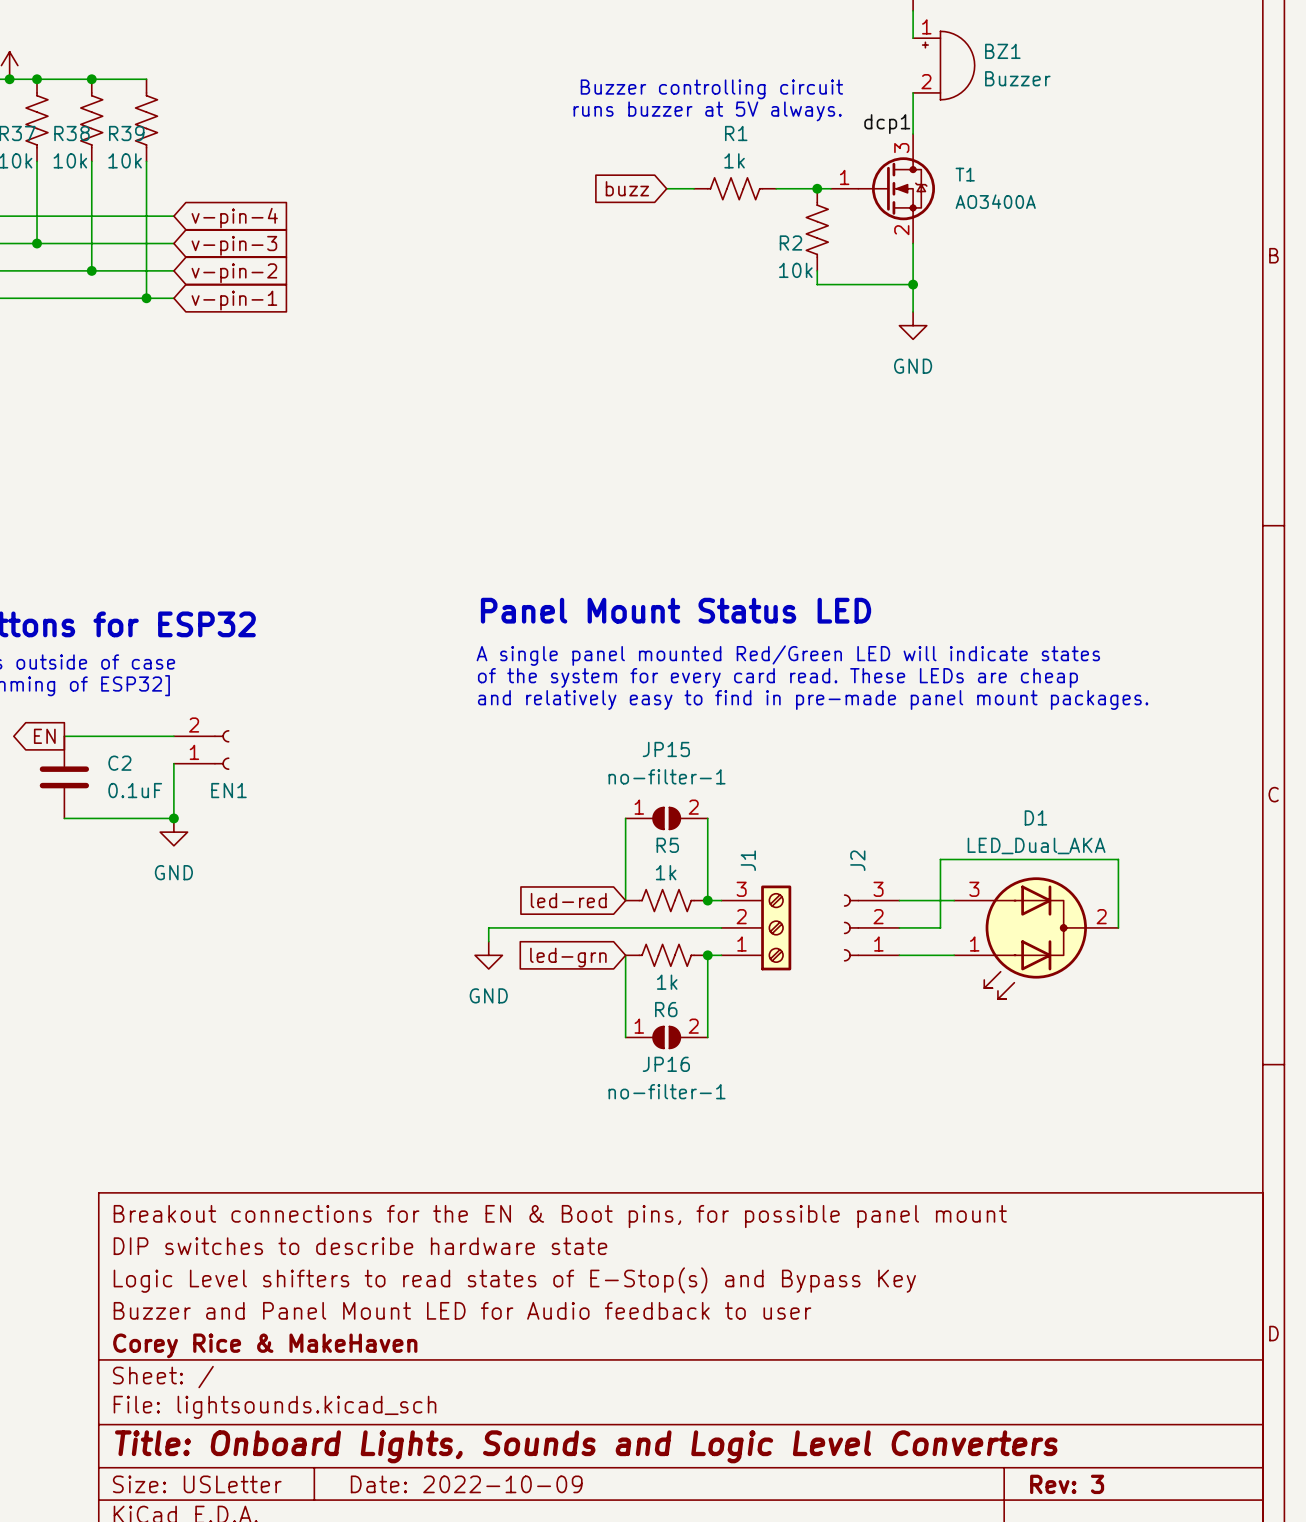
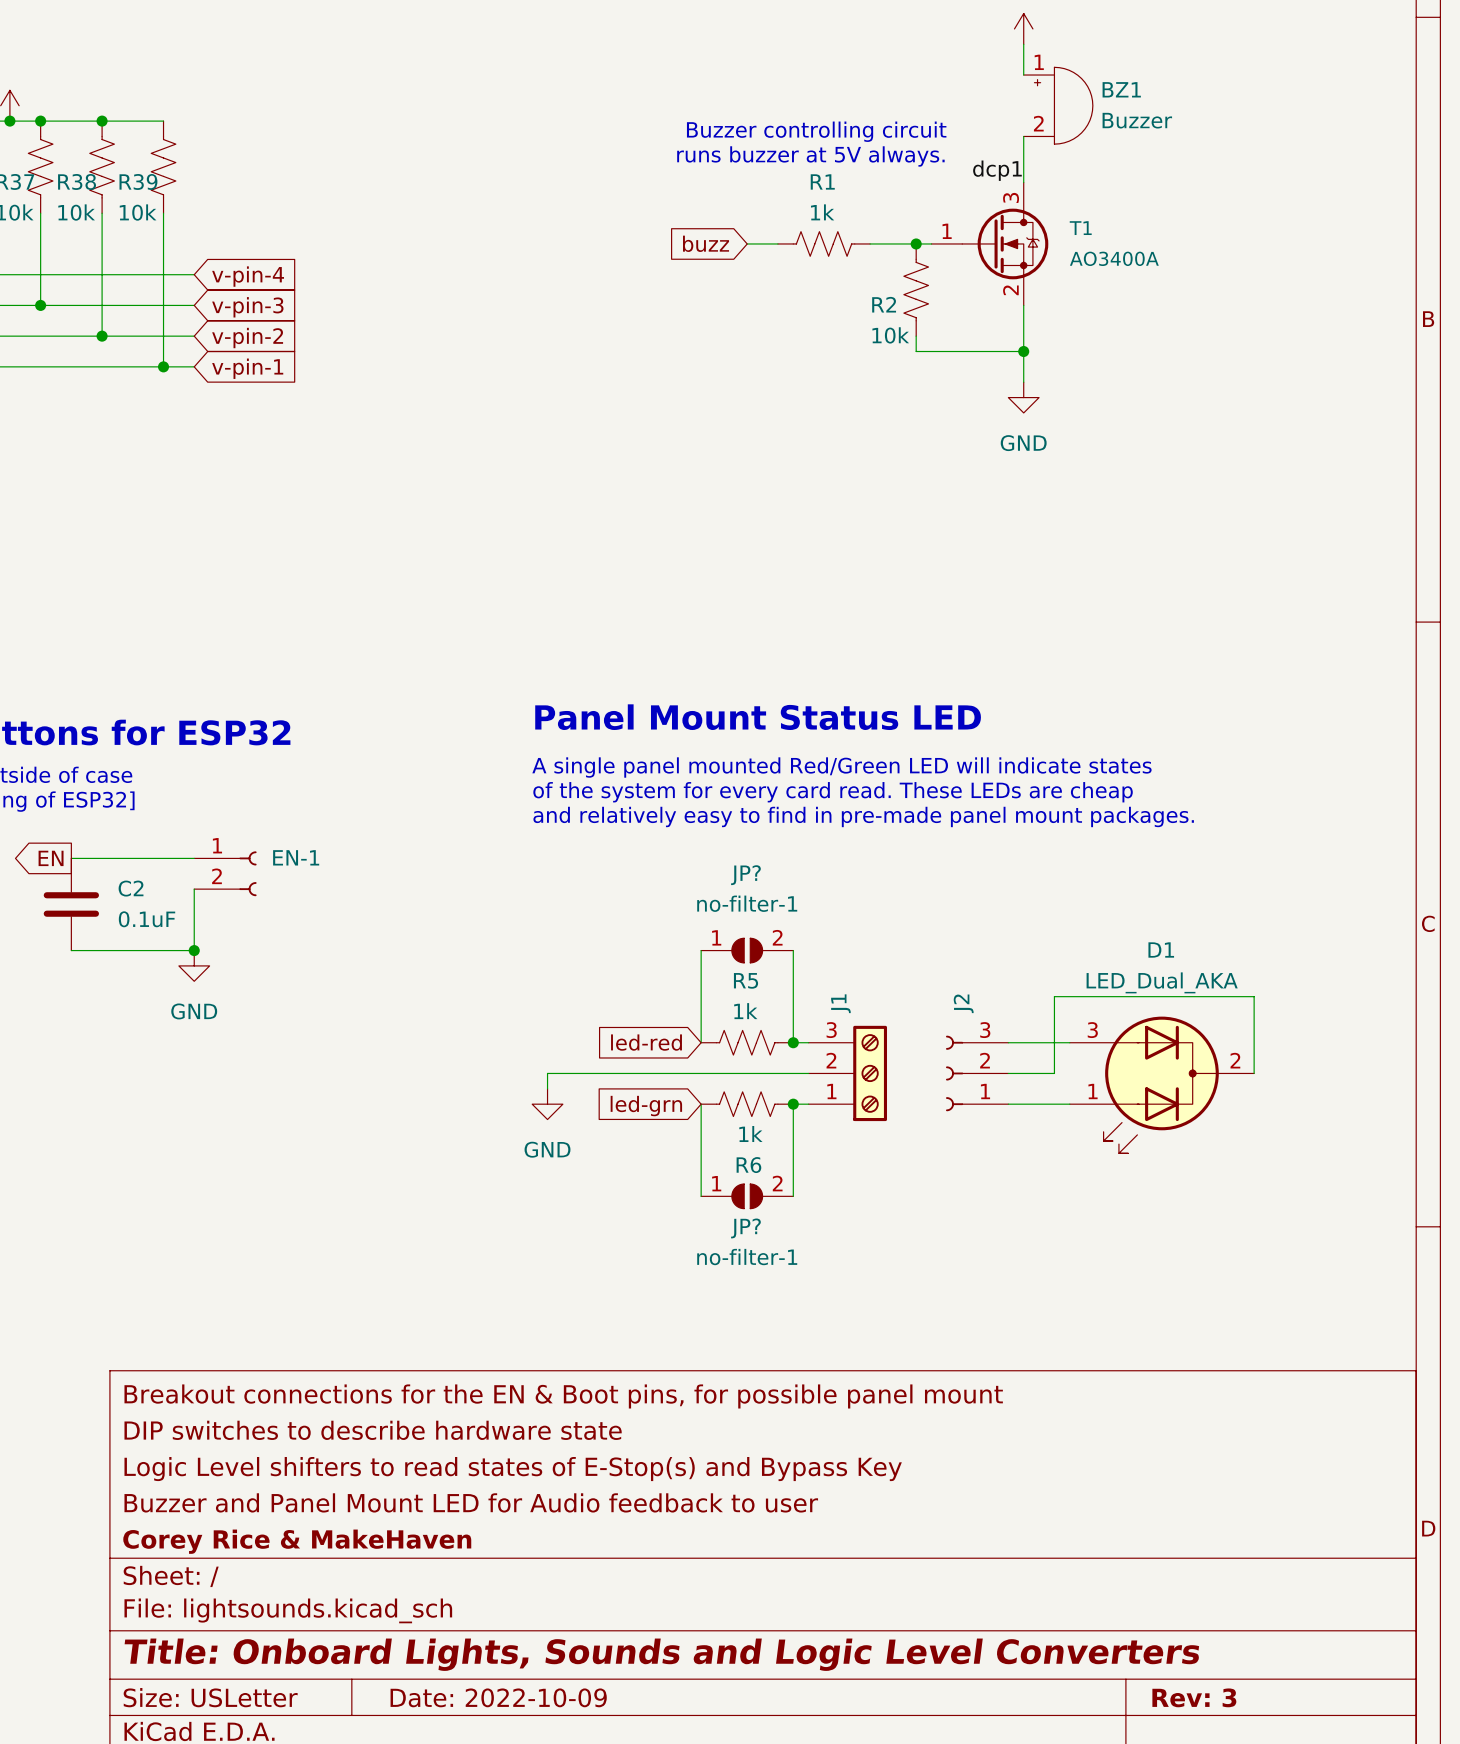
JP15 name: JP15 (666, 749) -> JP? (745, 875)
EN1 flip: as is (221, 750) -> up-down (248, 873)
EN1 name: EN1 (228, 790) -> EN-1 (296, 857)
JP16 name: JP16 (666, 1064) -> JP? (745, 1228)

